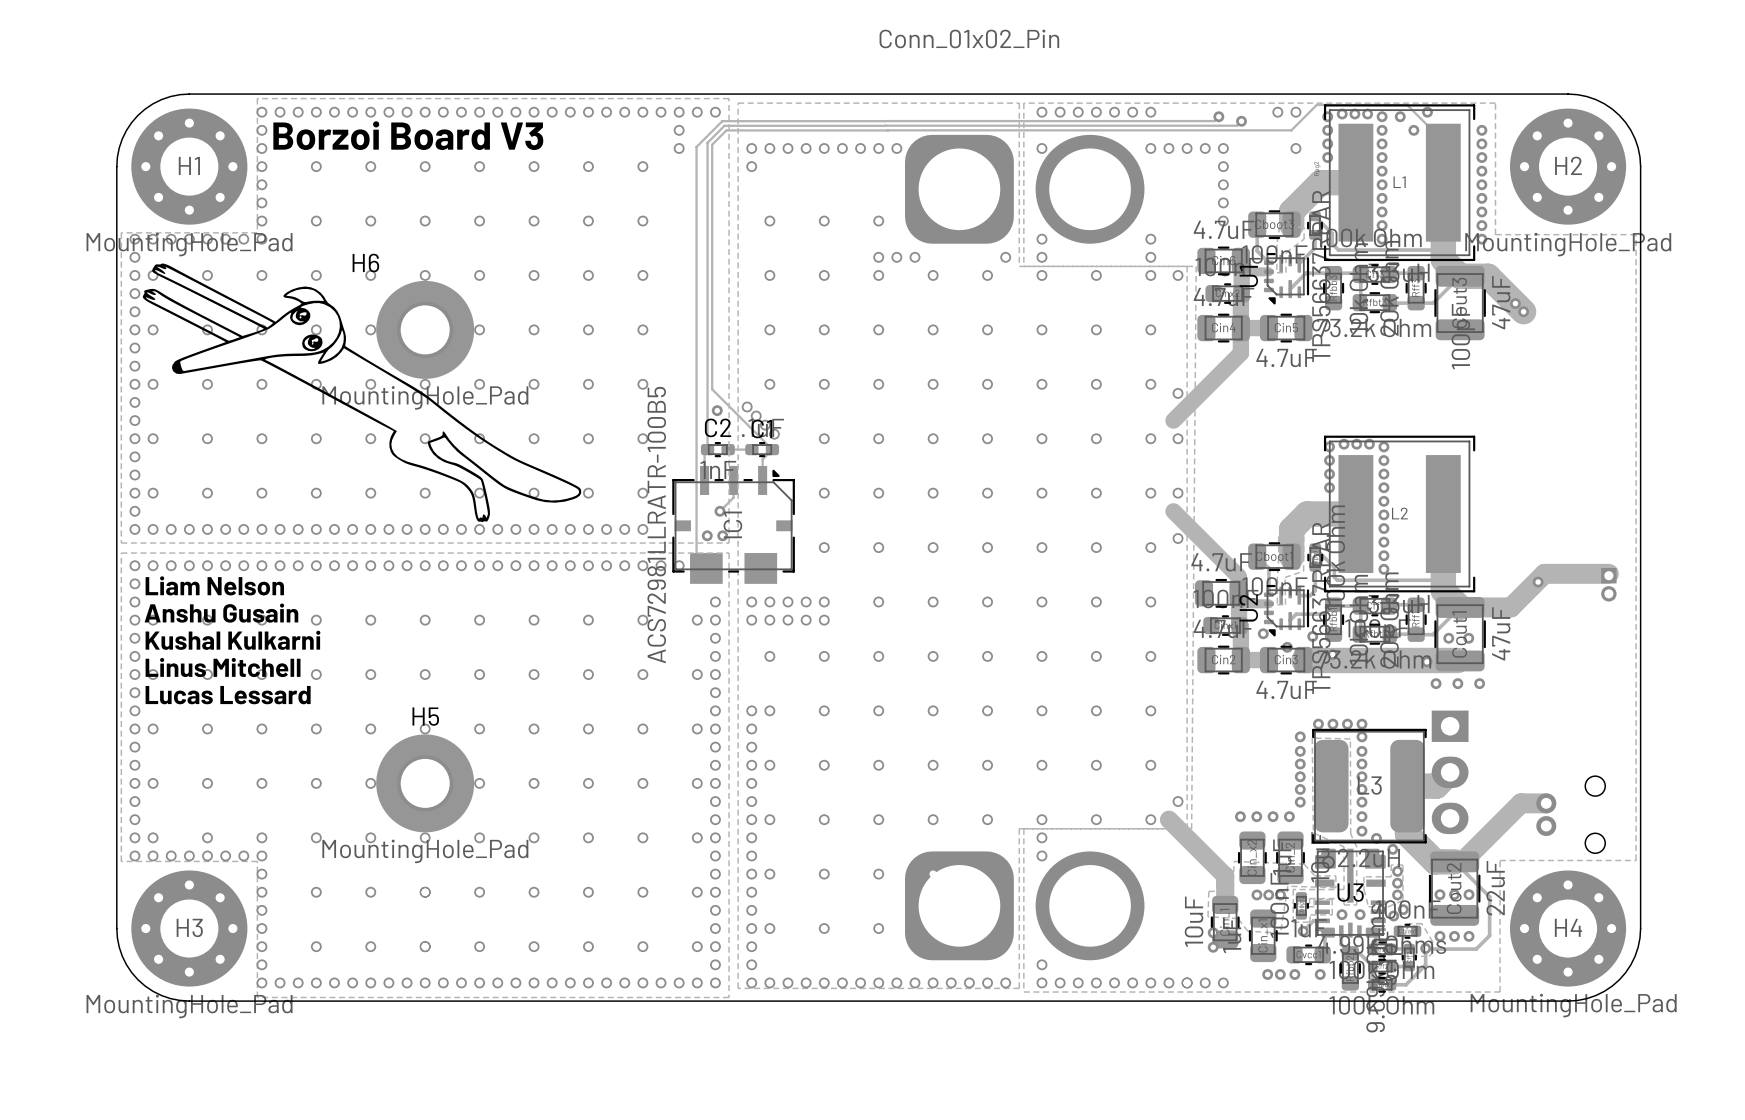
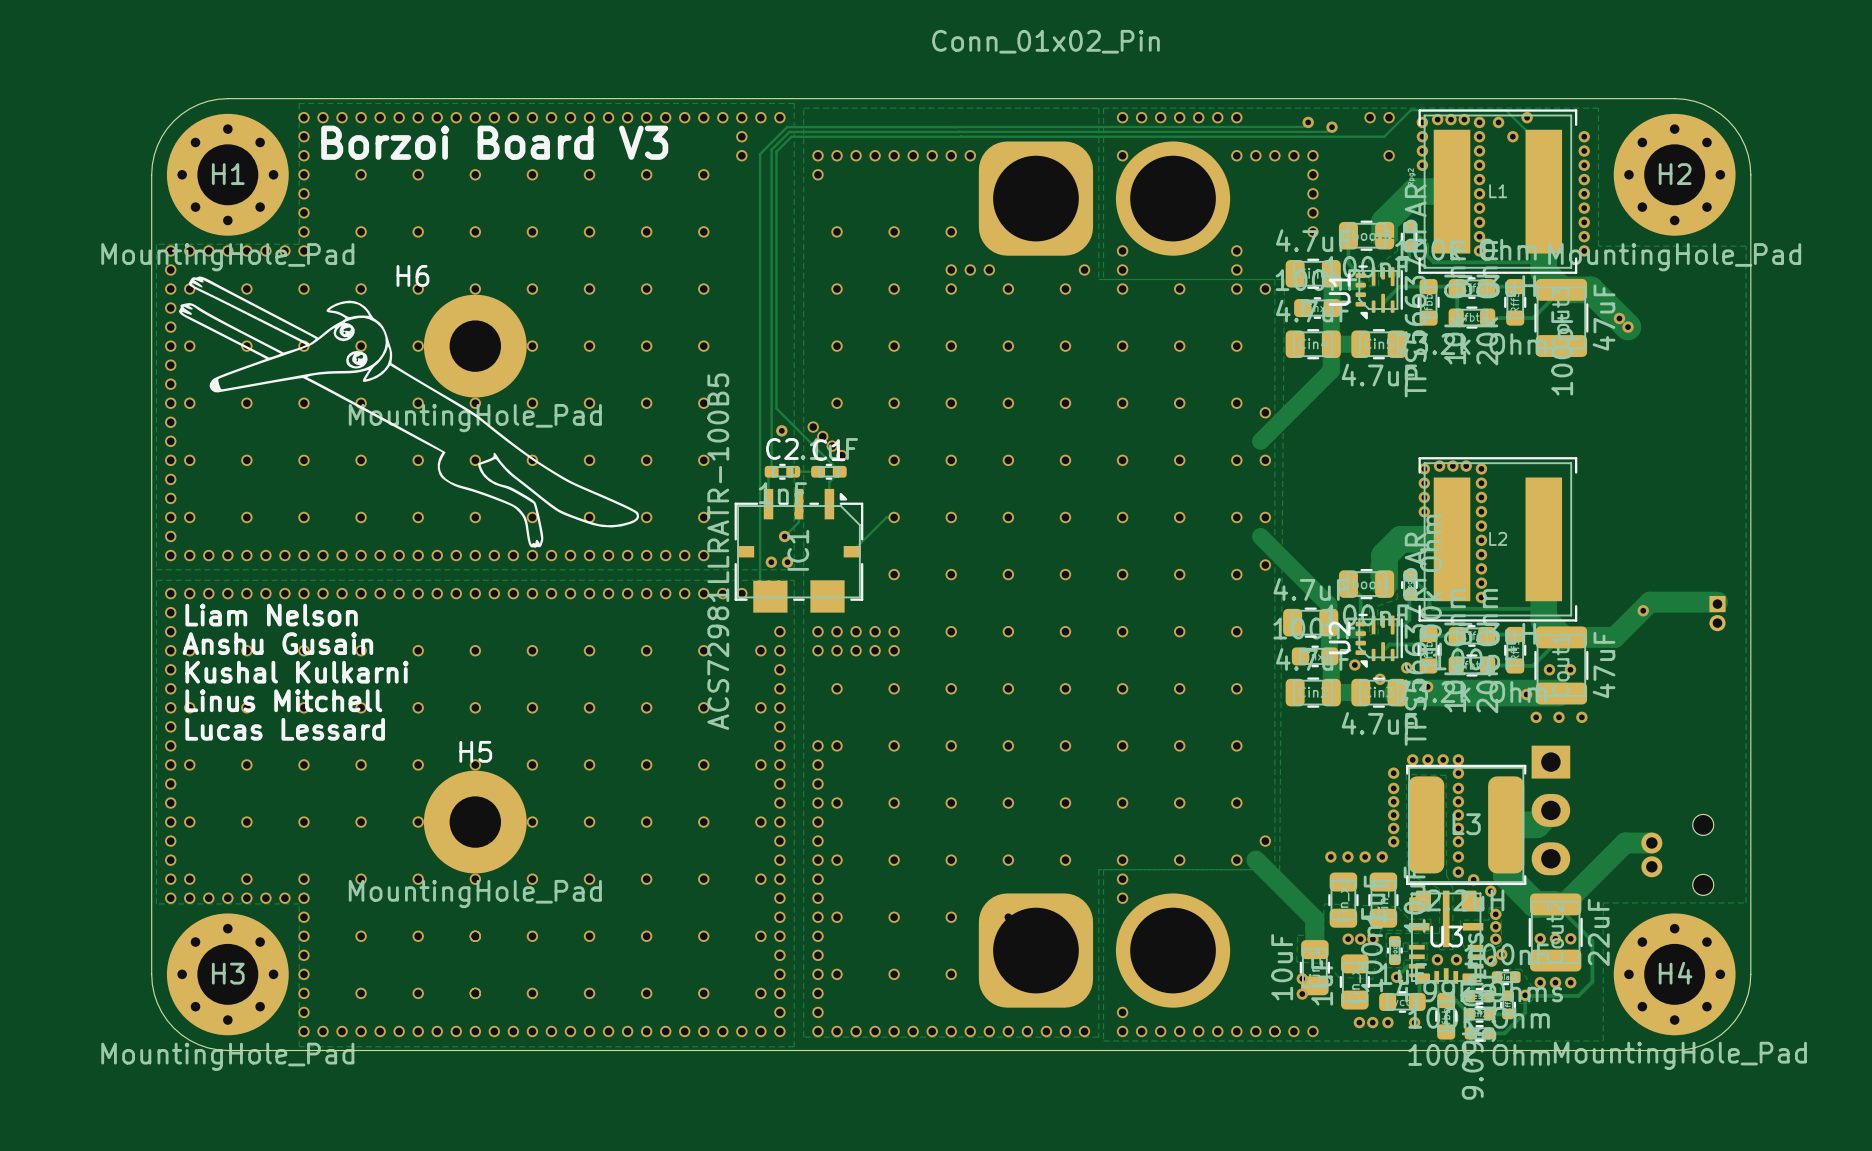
track: none -> (894, 517) (886, 517) (852, 551)

